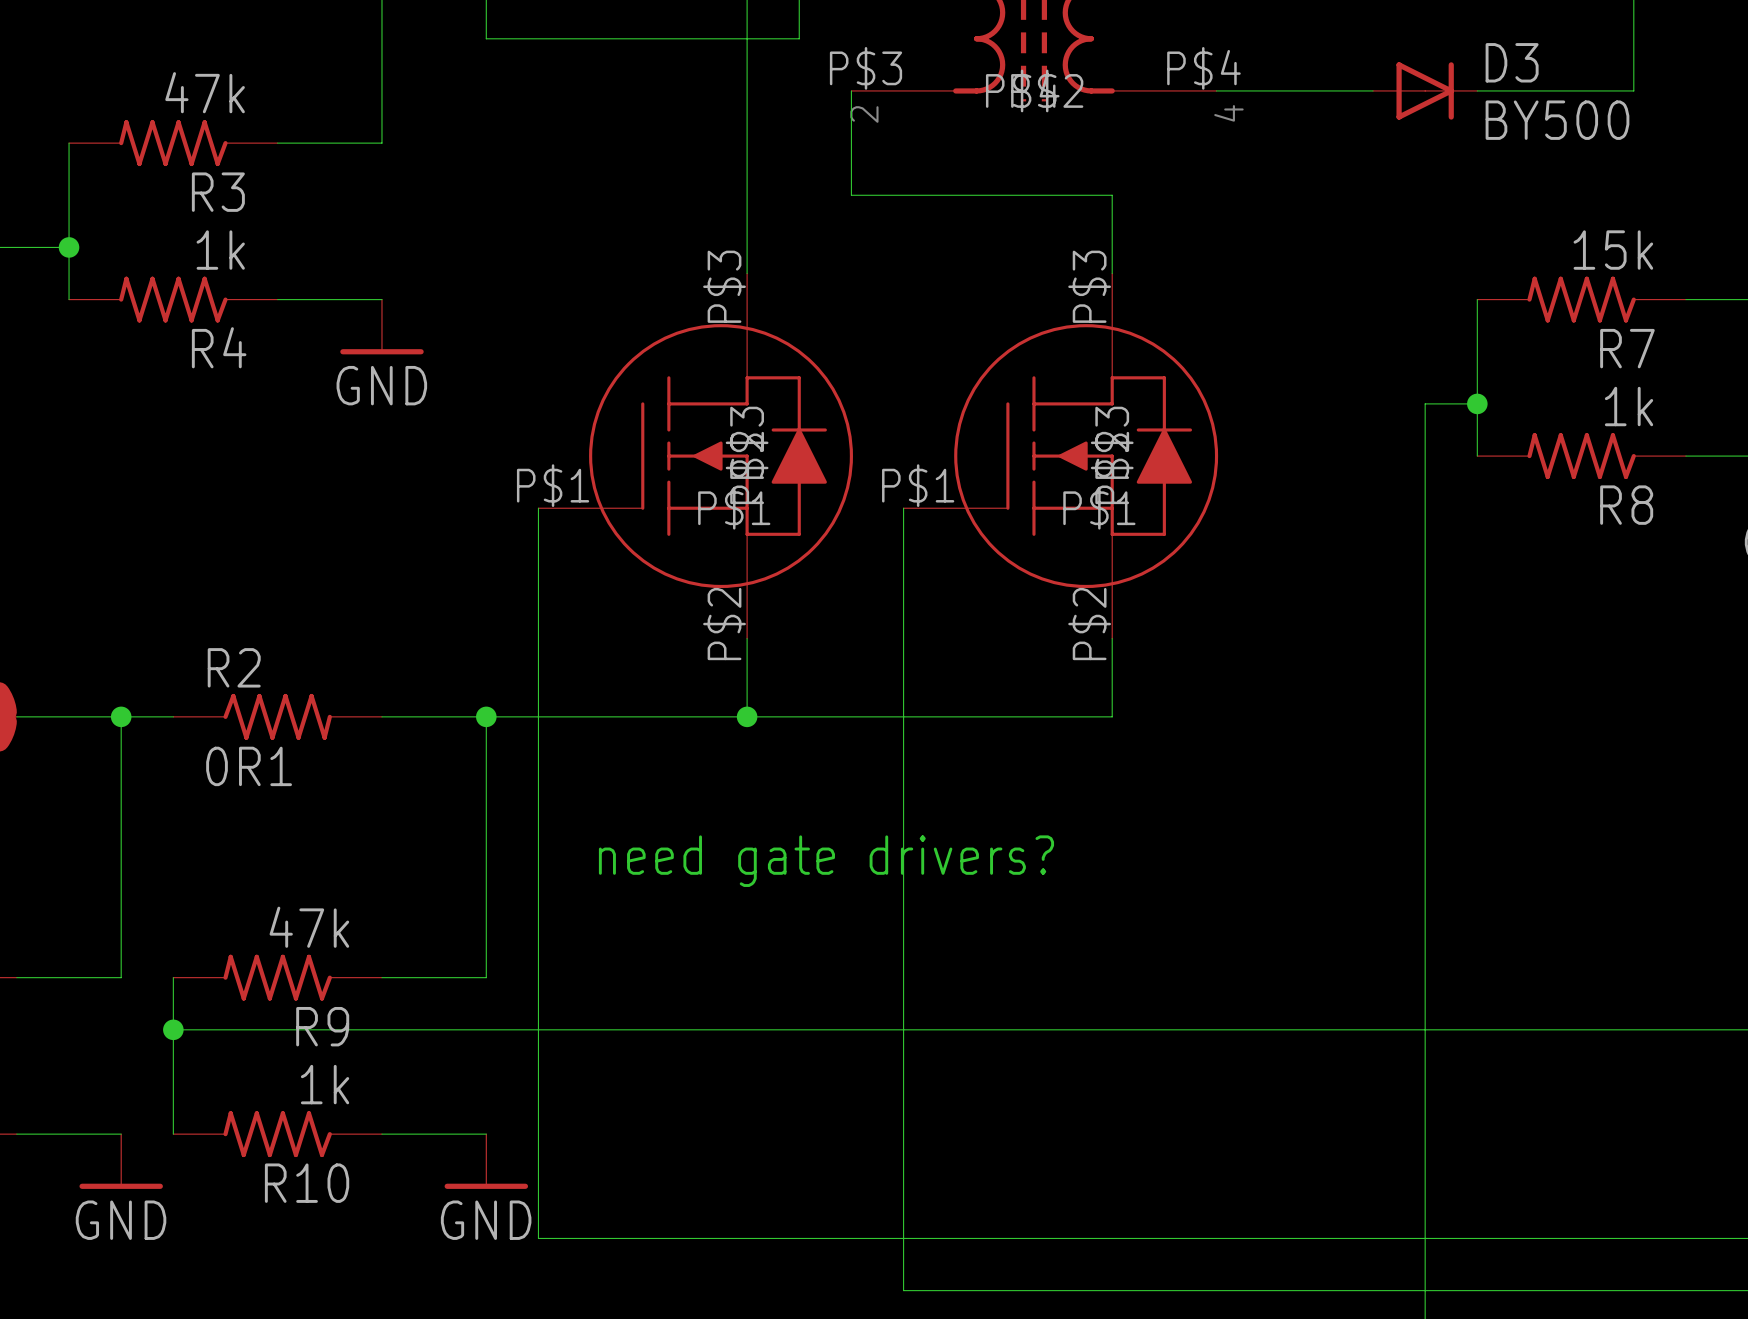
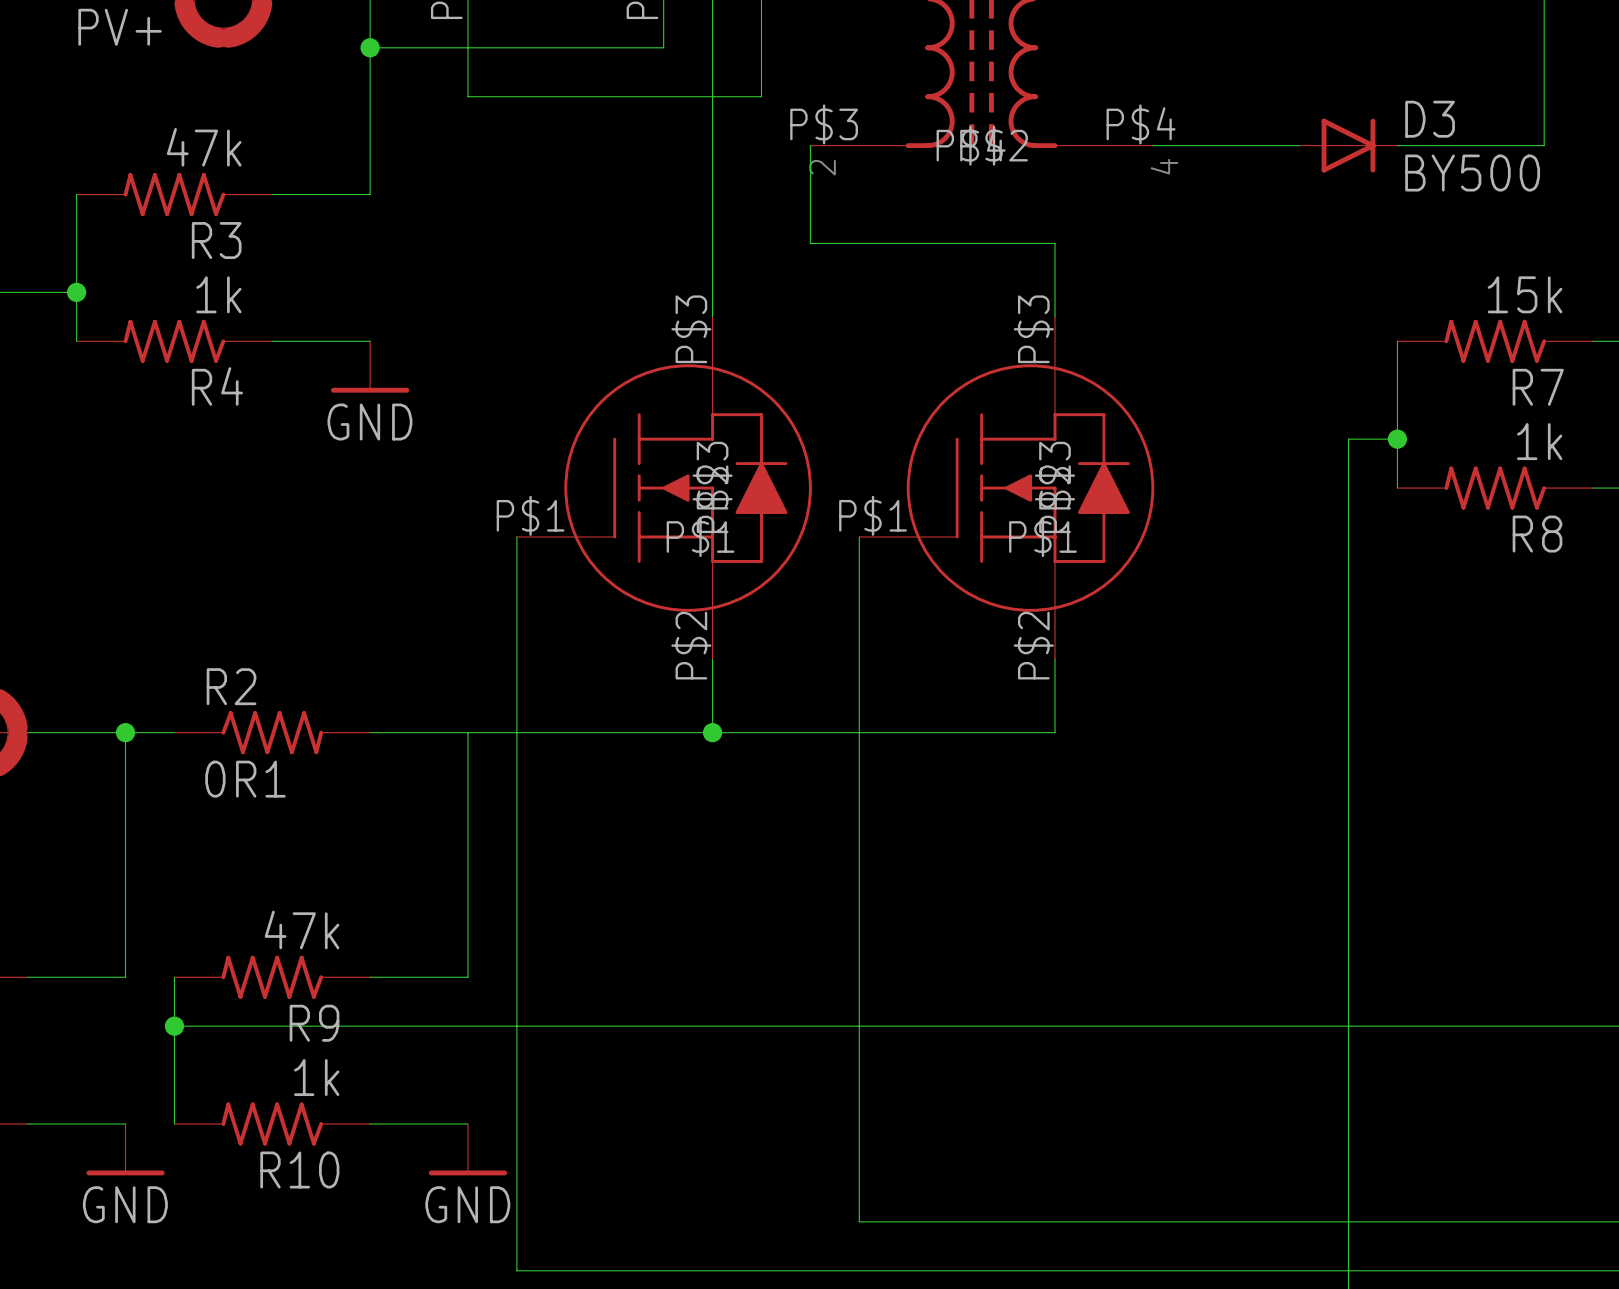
junction: (486, 716) -> none
text: need gate drivers? (826, 861) -> none
wire: (538, 1238) (903, 1238) (903, 1290) -> (516, 1221) (516, 1270) (859, 1270)

